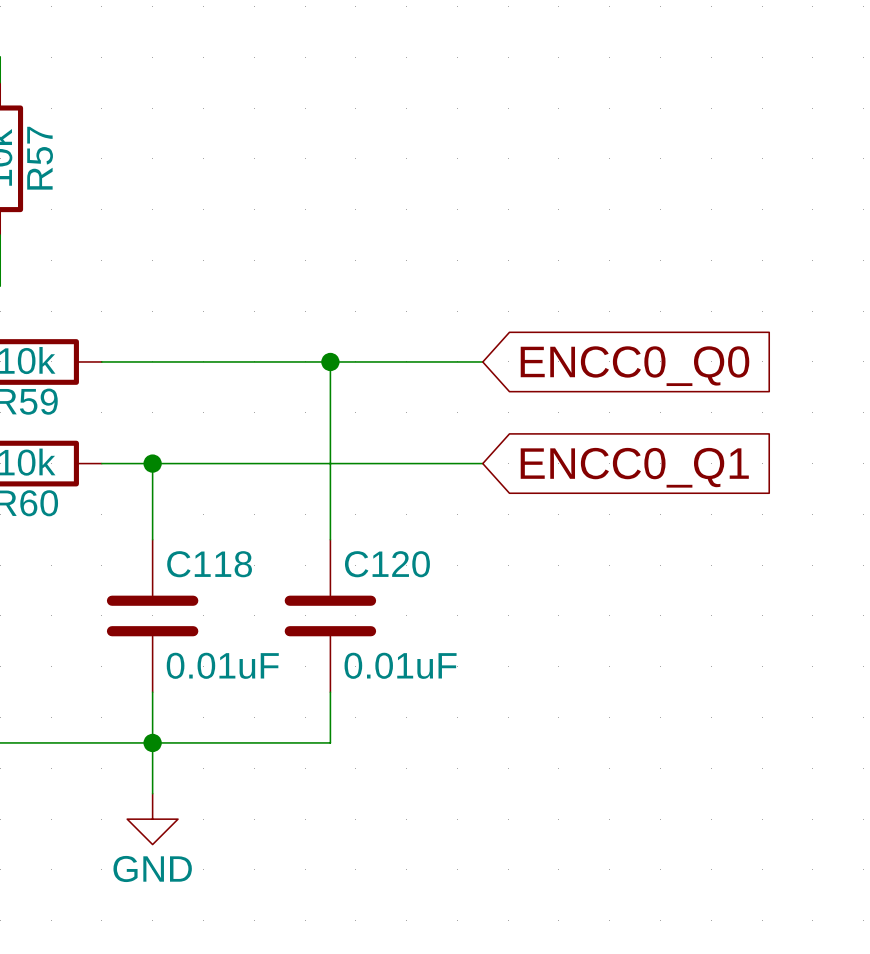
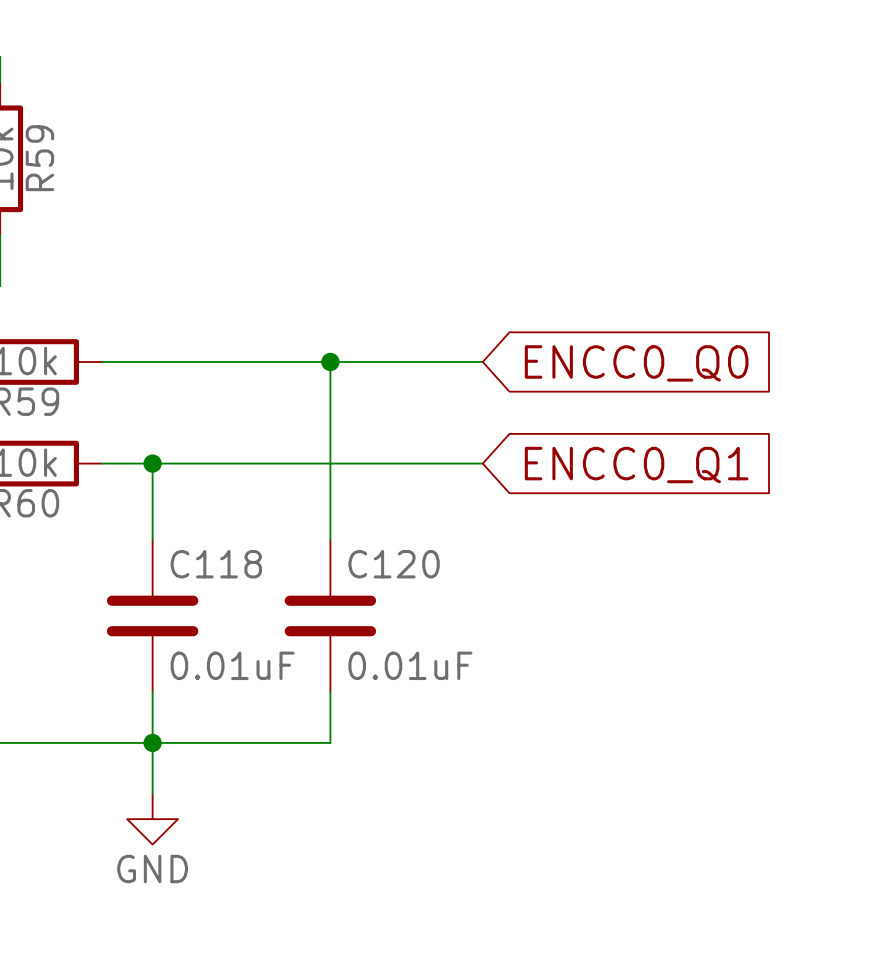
R57 name: R57 (40, 158) -> R59 (39, 158)

